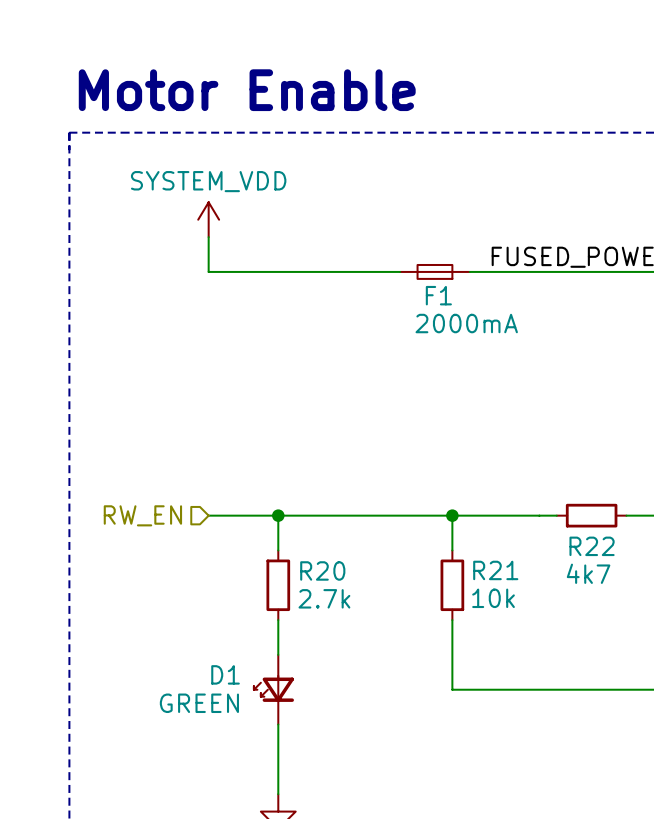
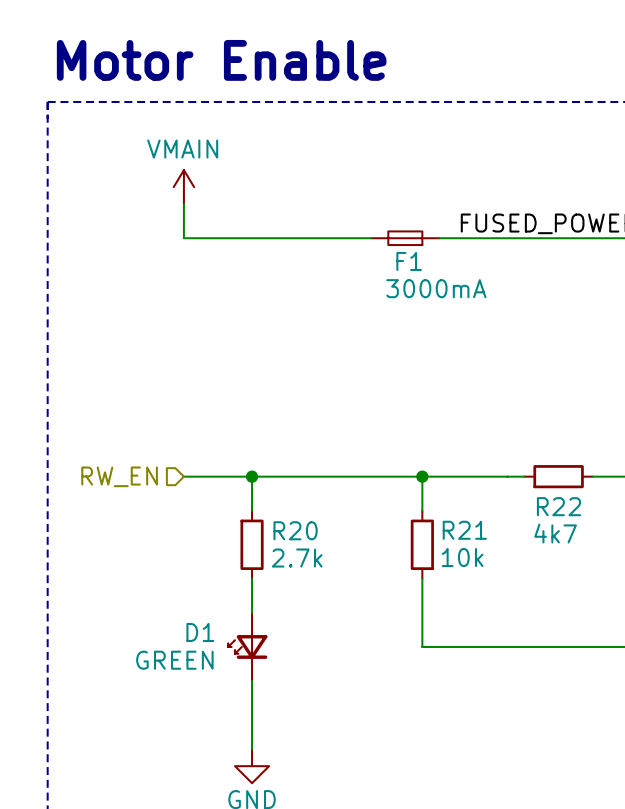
power symbol: SYSTEM_VDD (208, 219) -> VMAIN (183, 187)
F1 value: 2000mA (466, 323) -> 3000mA (436, 288)

